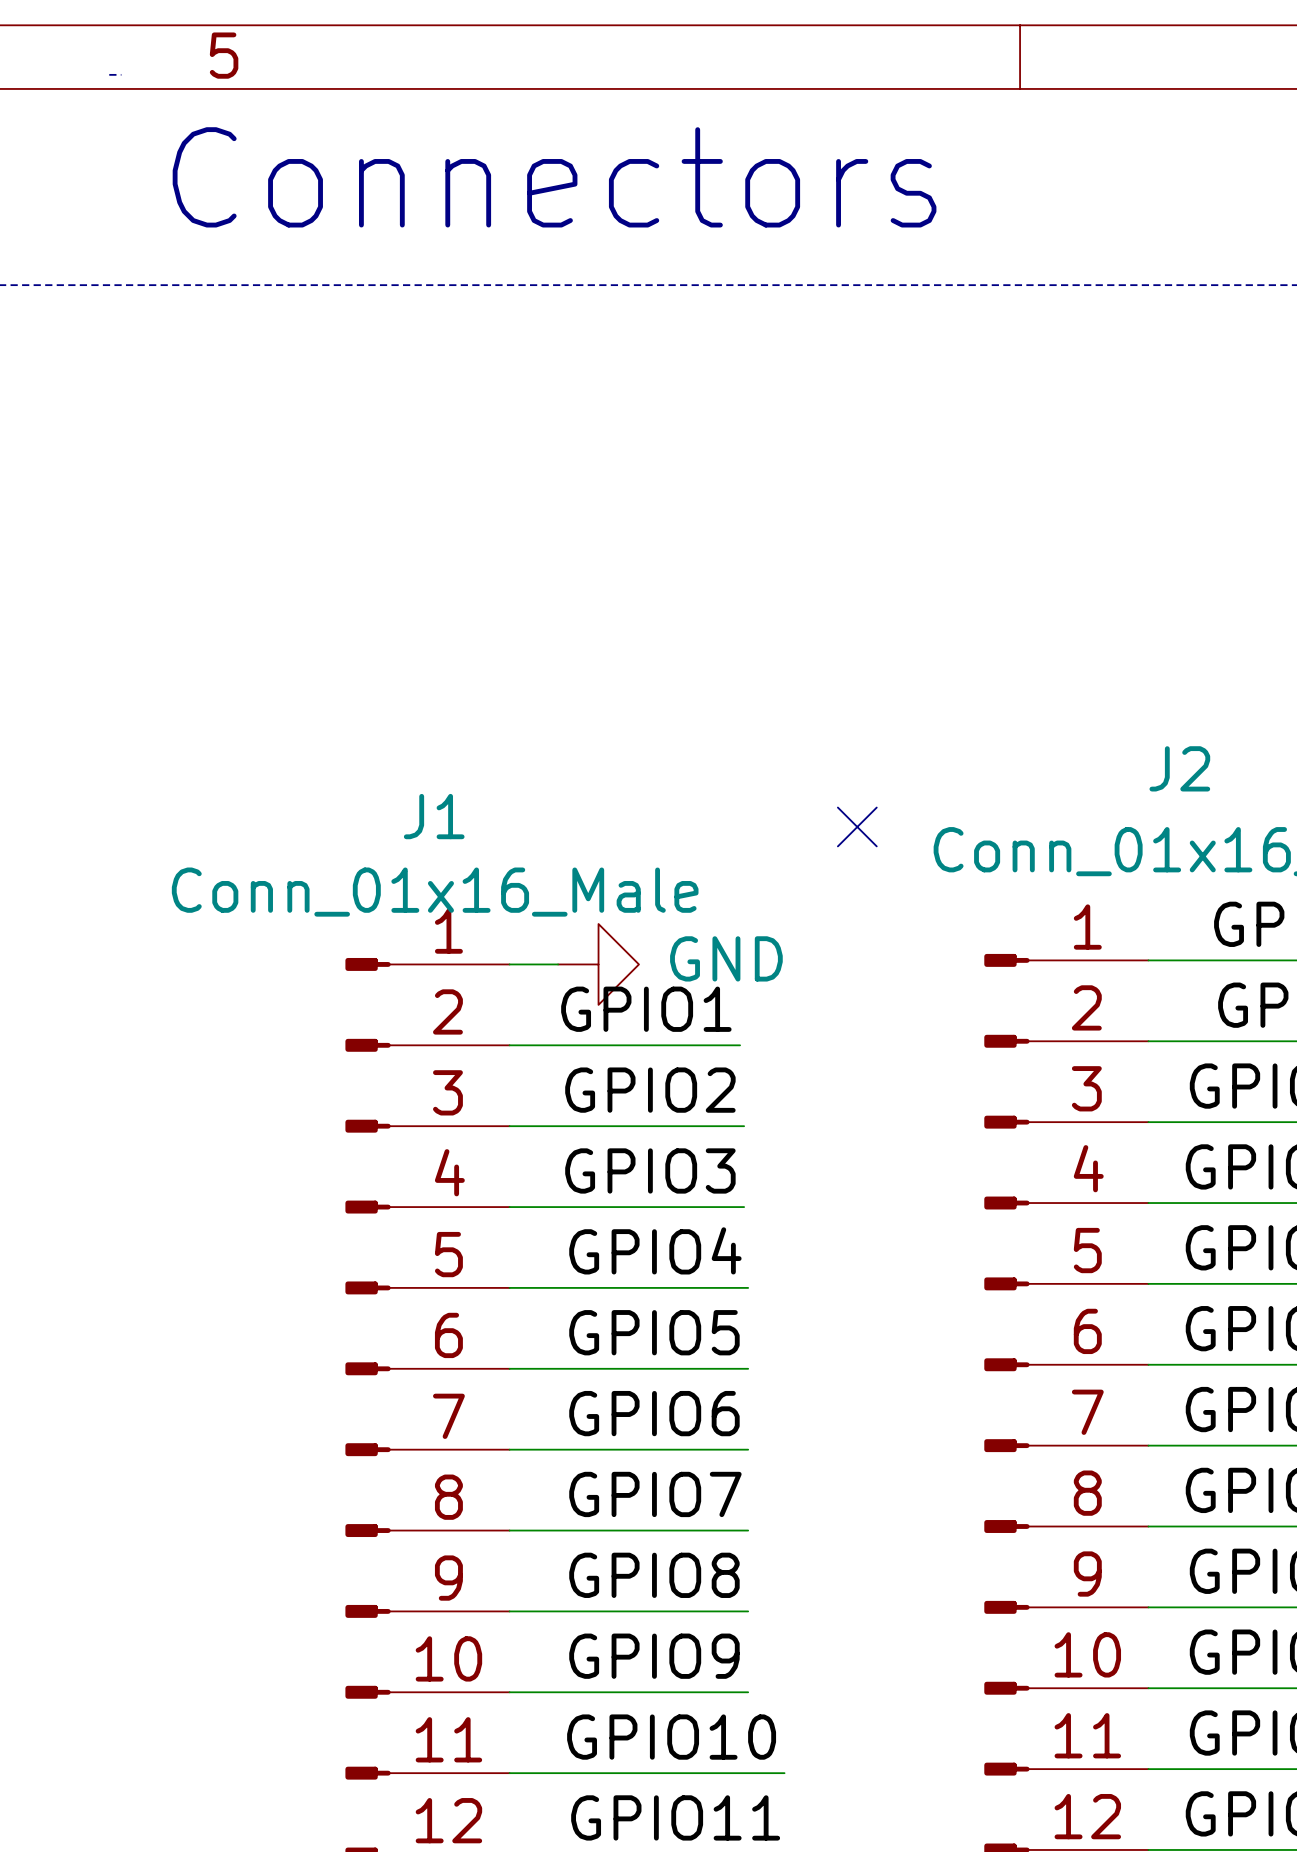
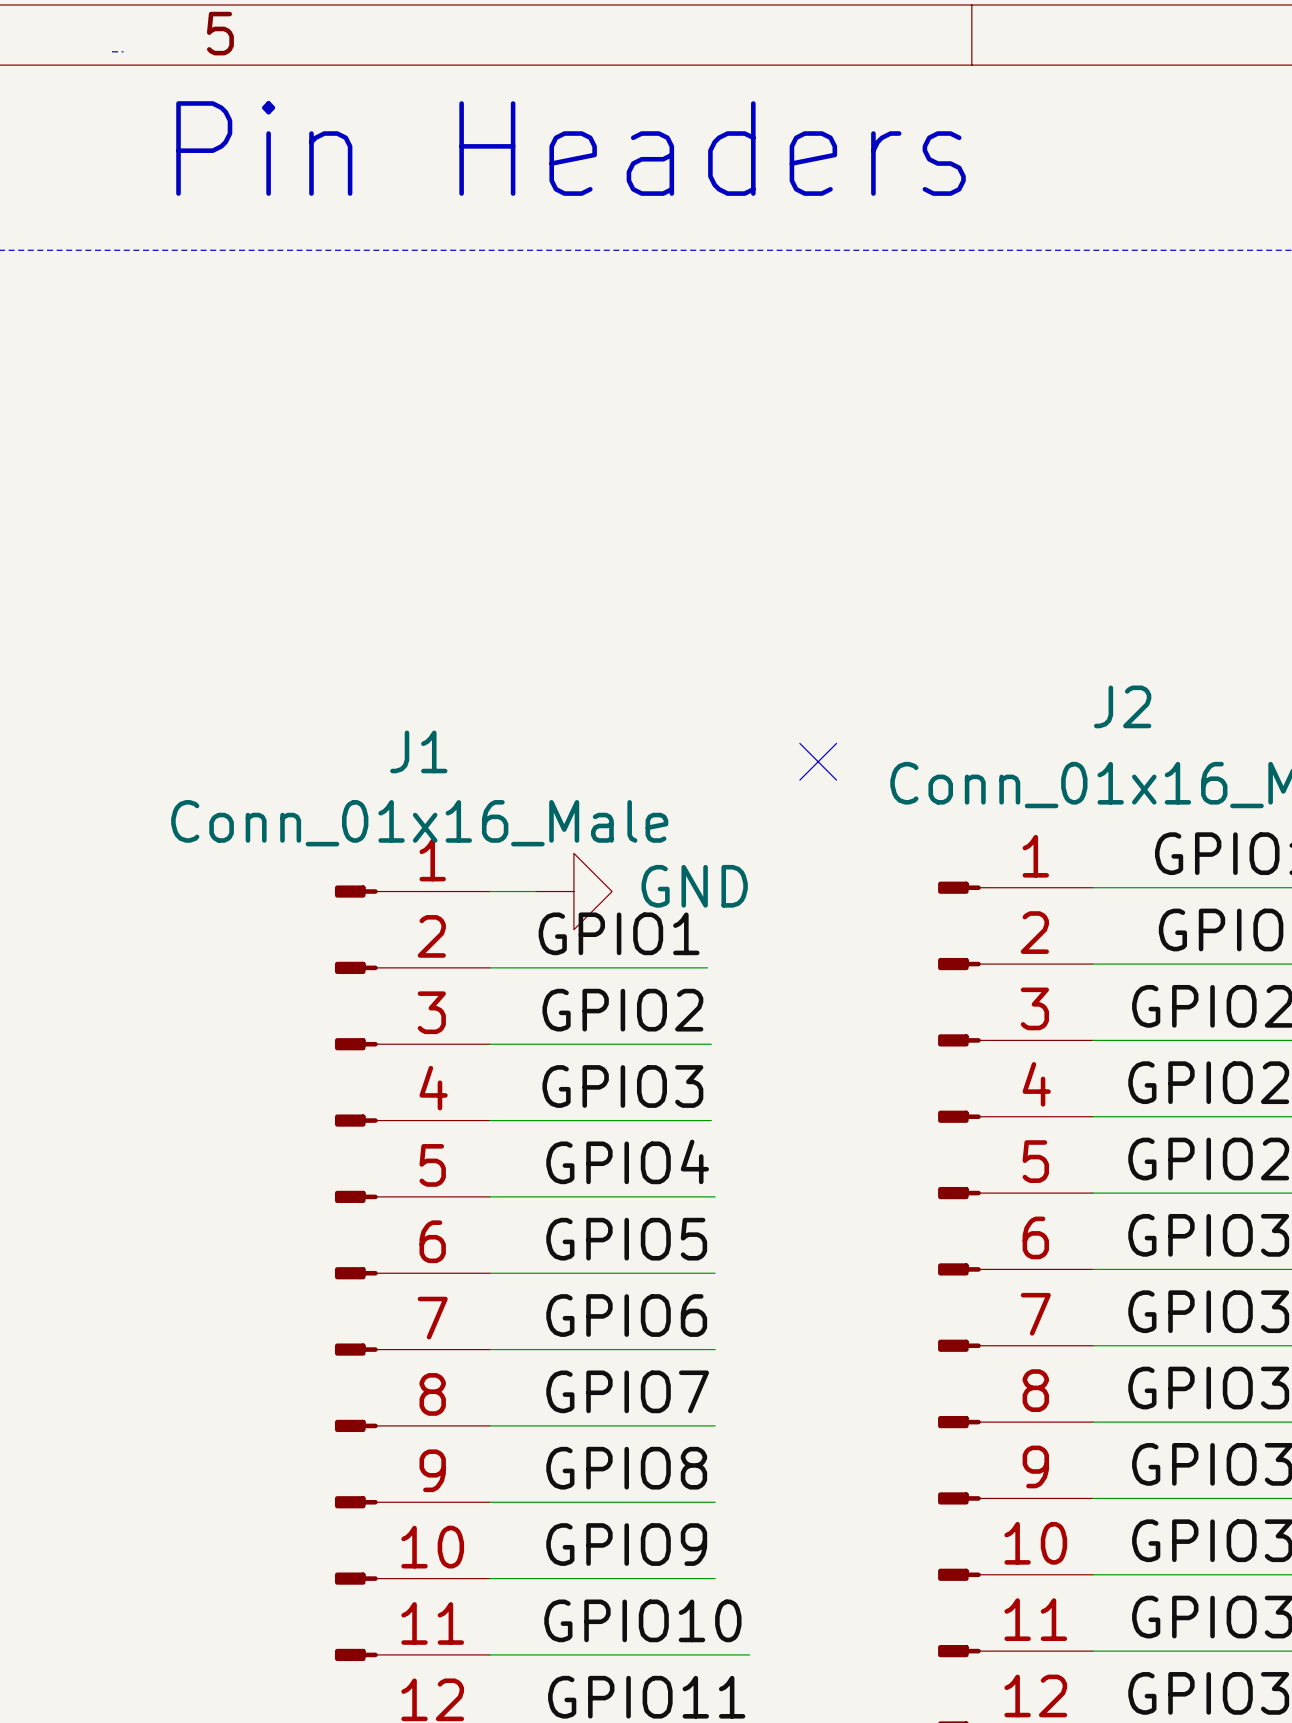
text: Connectors (554, 177) -> Pin Headers (571, 148)

